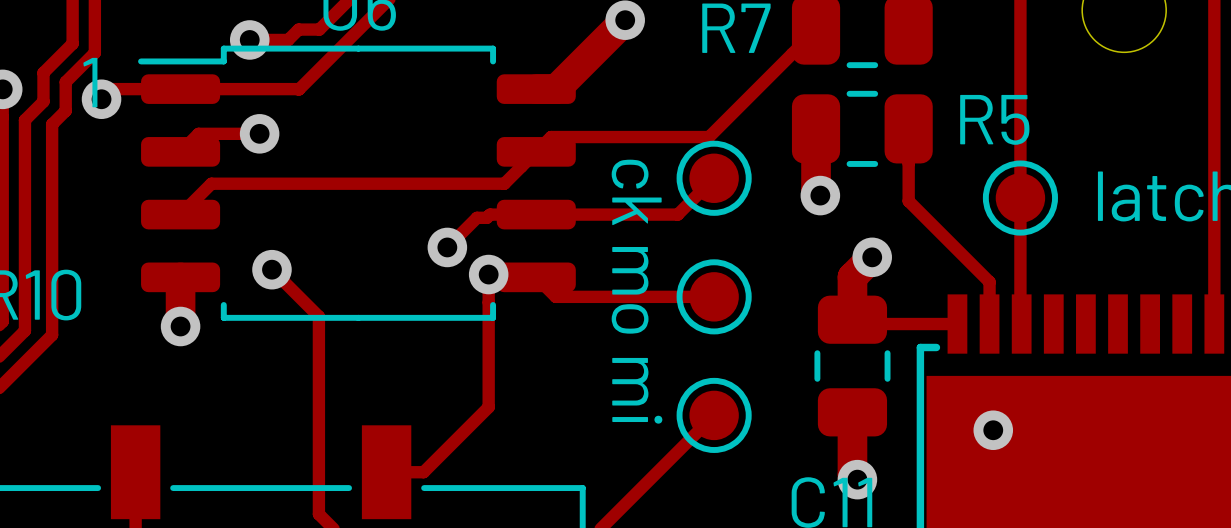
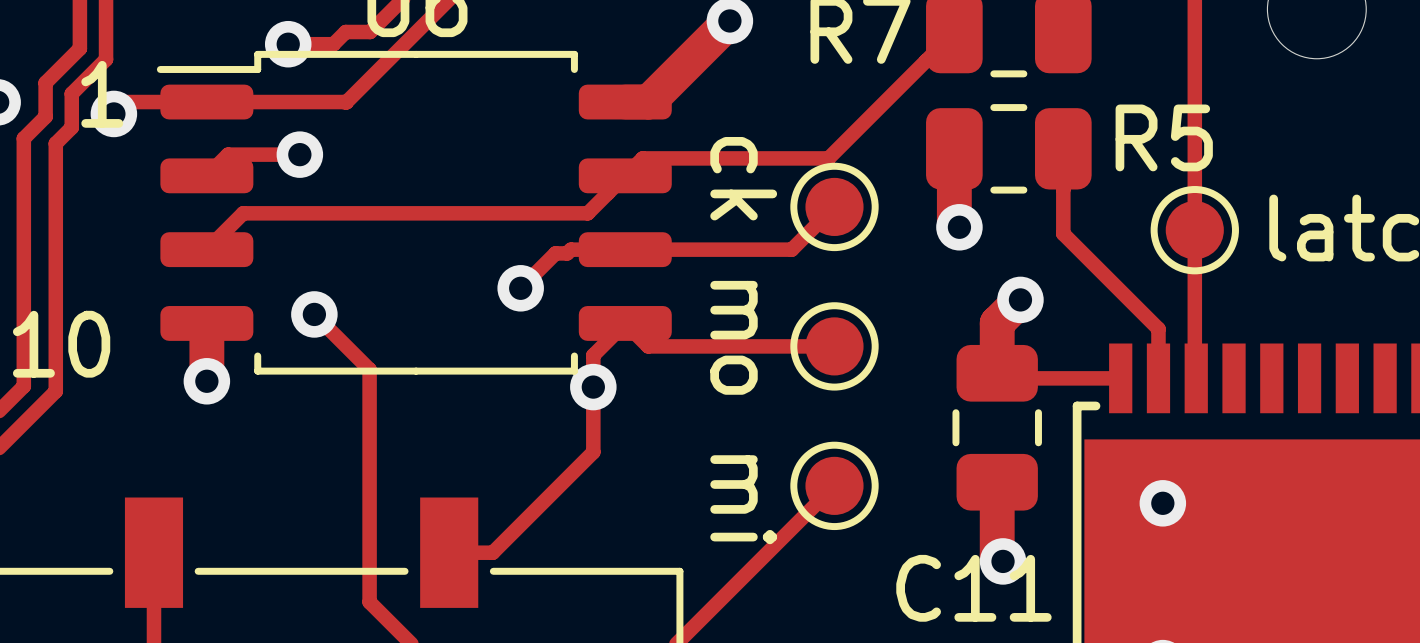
via position: (488, 274) -> (593, 387)
track: (536, 277) (491, 277) (488, 274) (488, 407) -> (625, 323) (593, 355) (593, 452) (569, 476)

